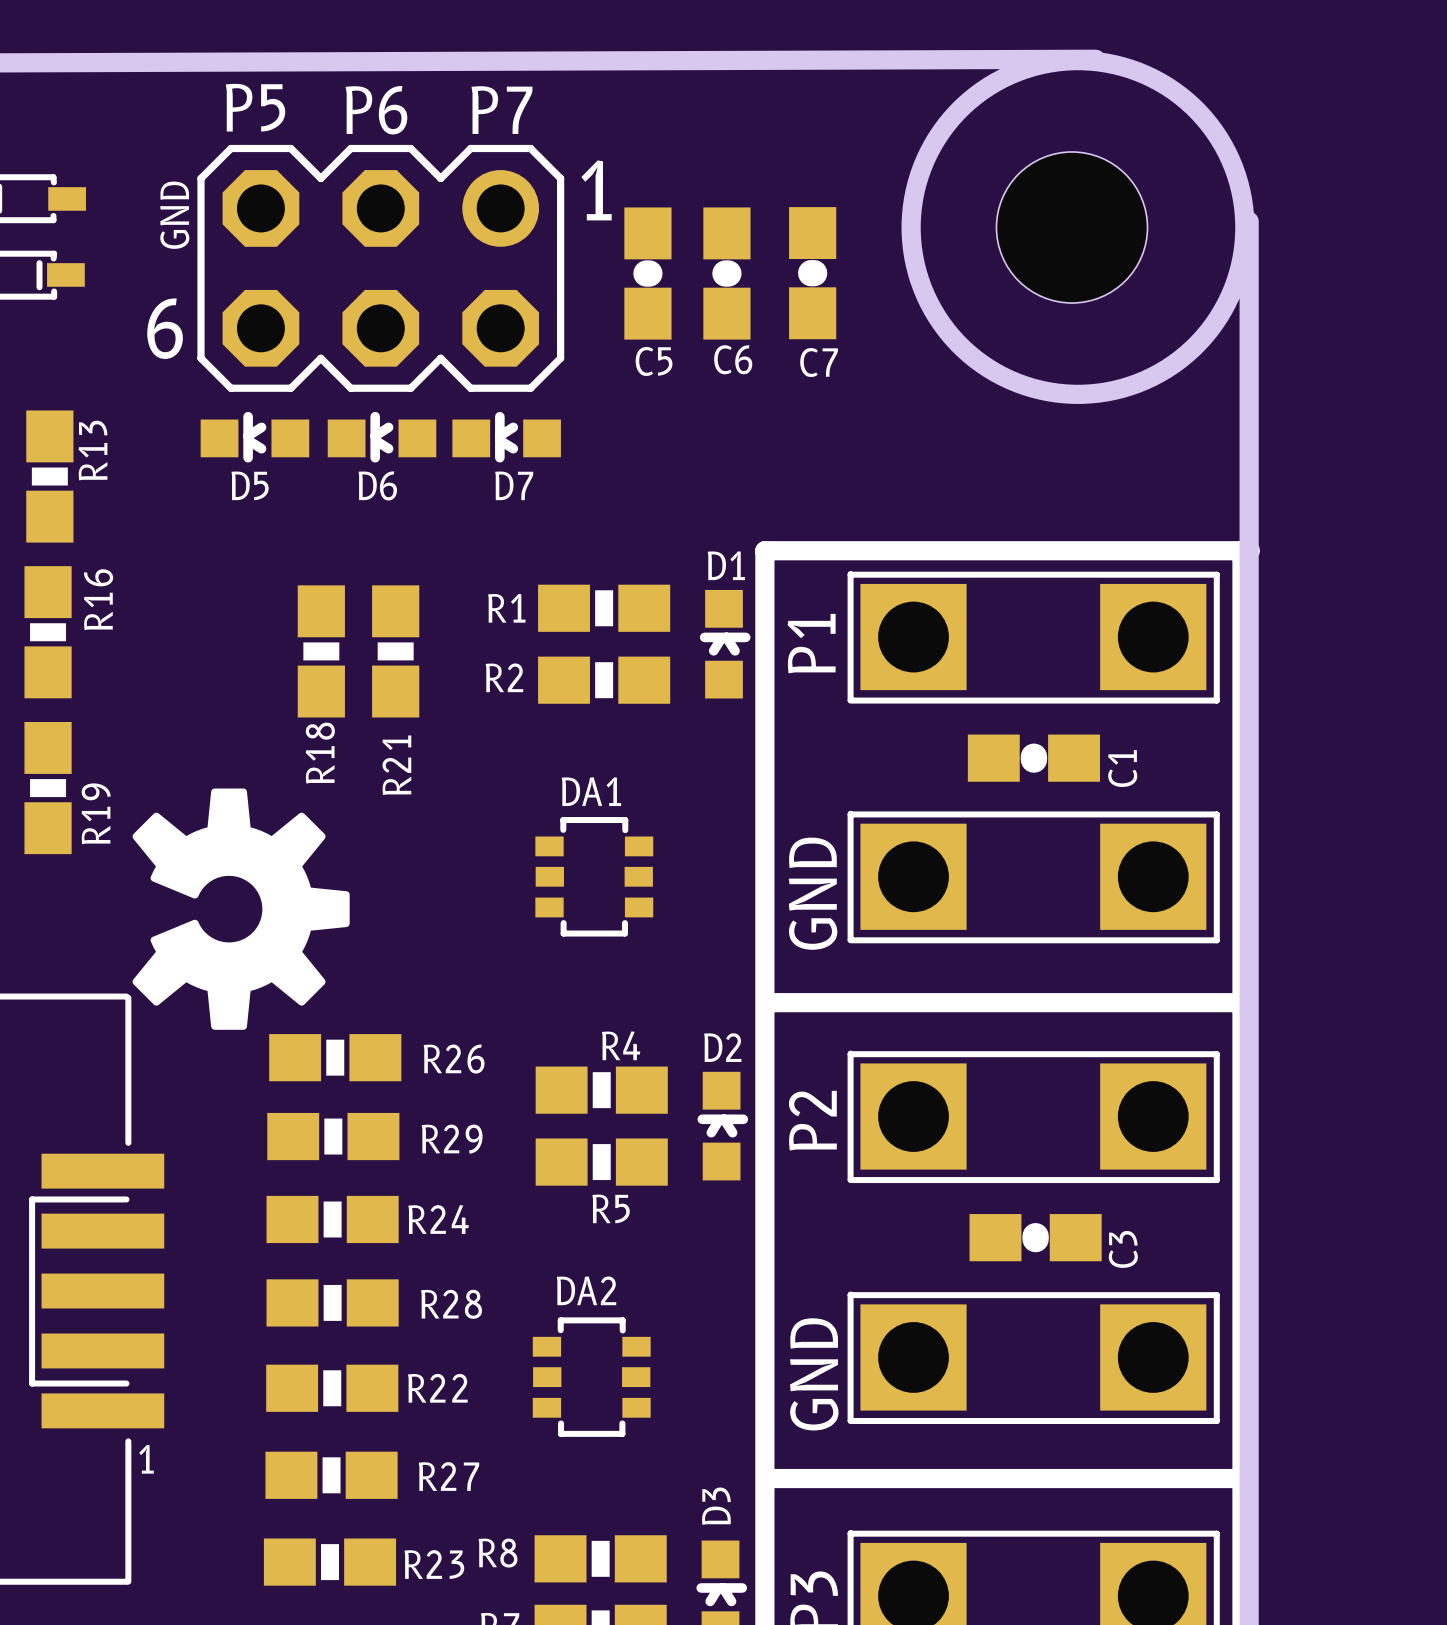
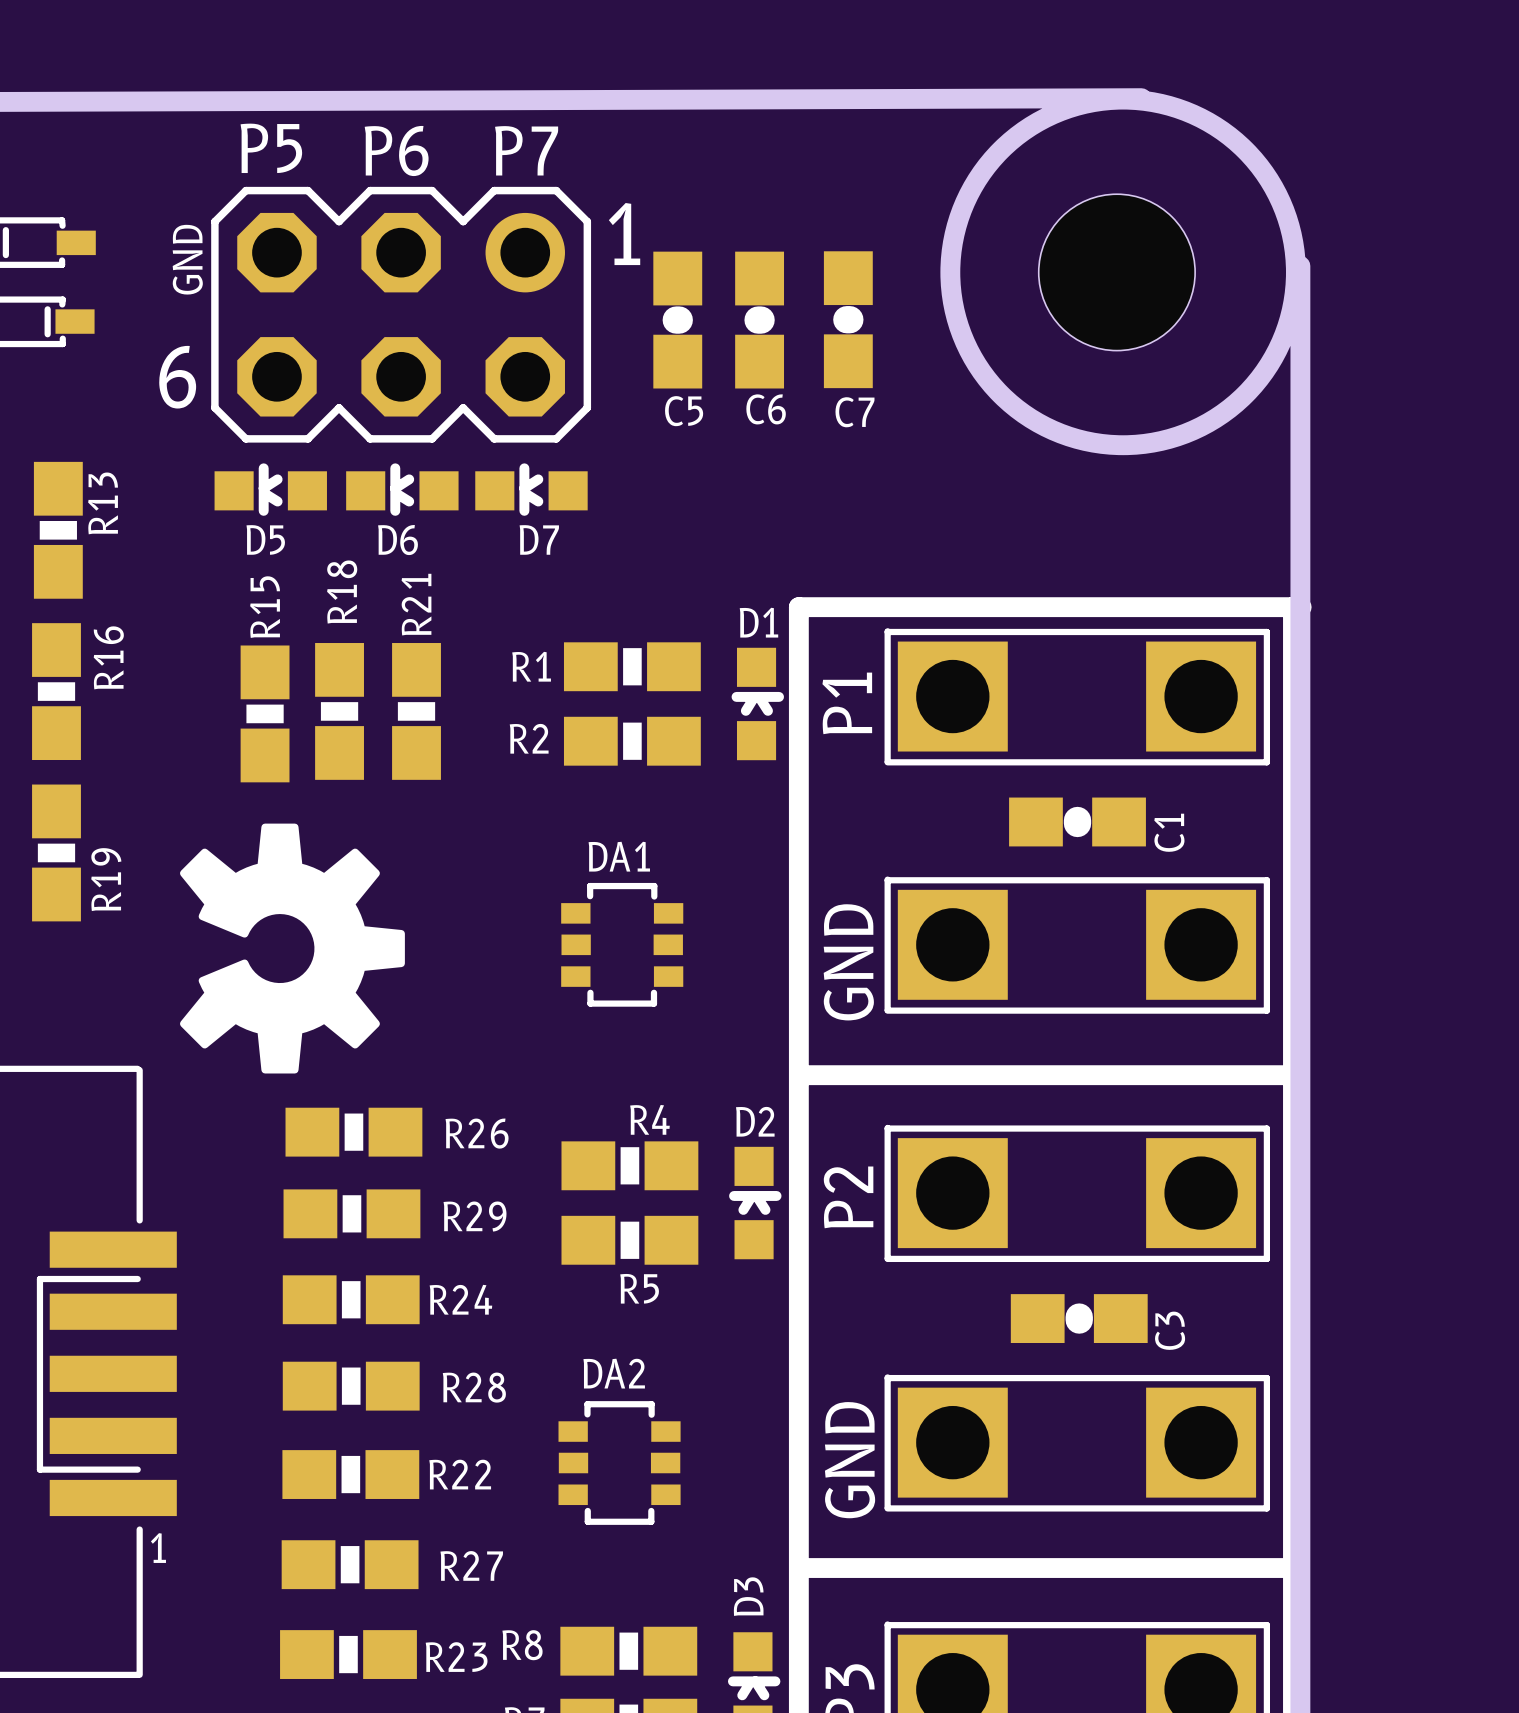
R15: none -> (265, 713)
R18 name position: R18 (320, 753) -> R18 (342, 592)
R21 name position: R21 (396, 765) -> R21 (416, 604)
drawing position: (241, 909) -> (292, 948)

